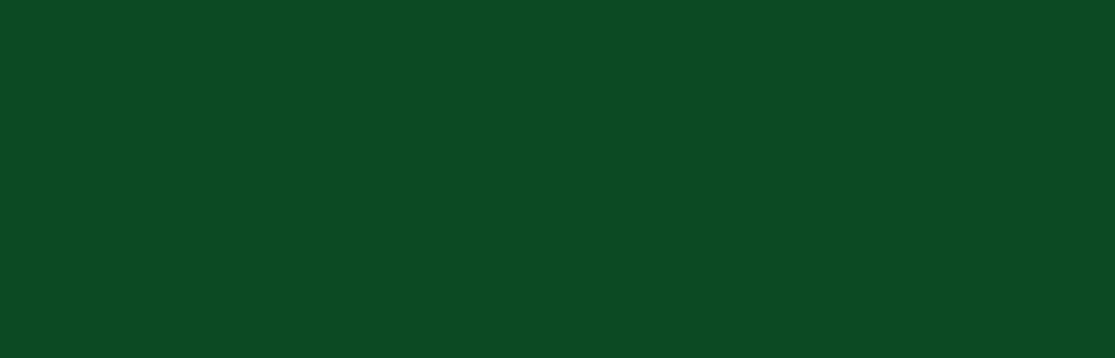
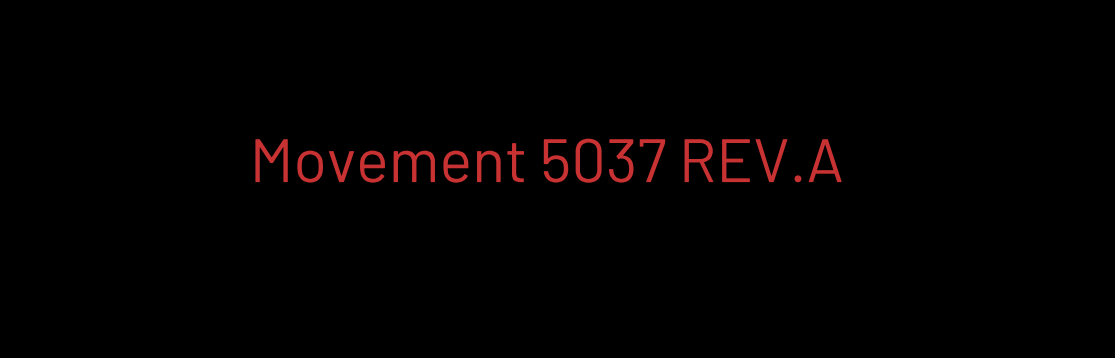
text: none -> Movement 5037 REV.A (548, 160)

